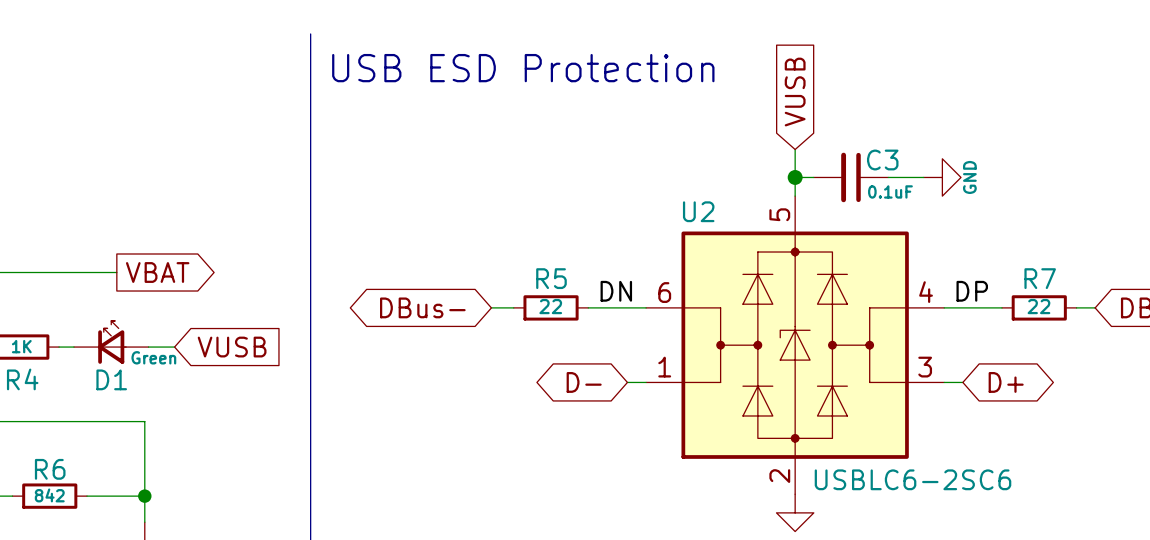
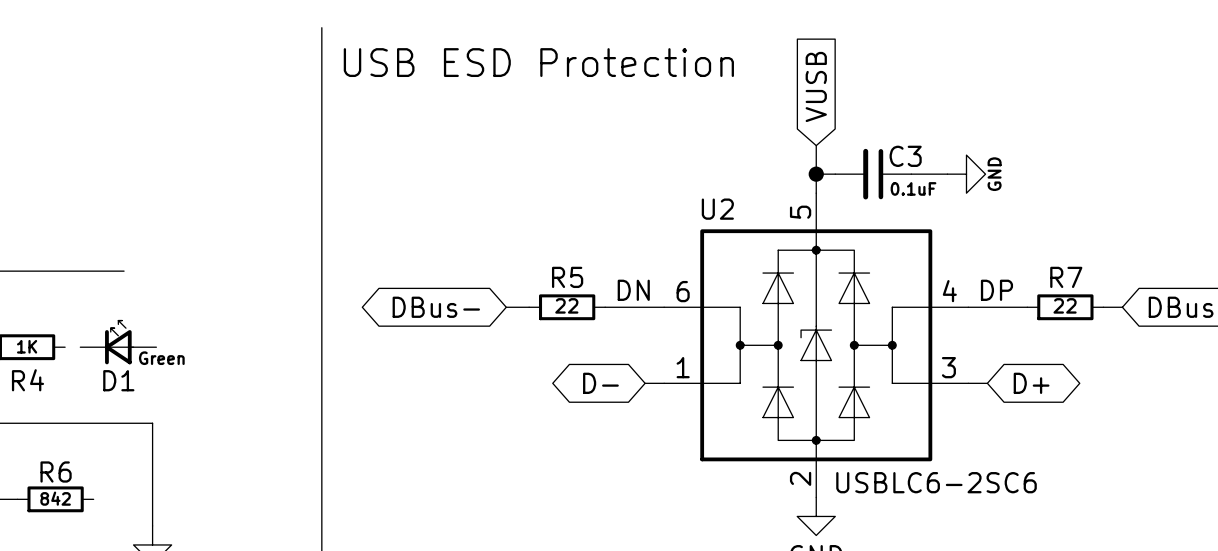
global label: VBAT (157, 272) -> none
wire: (59, 347) (73, 347) -> none
wire: (148, 347) (174, 347) -> none
global label: VUSB (232, 347) -> none
wire: (87, 496) (144, 496) -> none
junction: (144, 496) -> none

